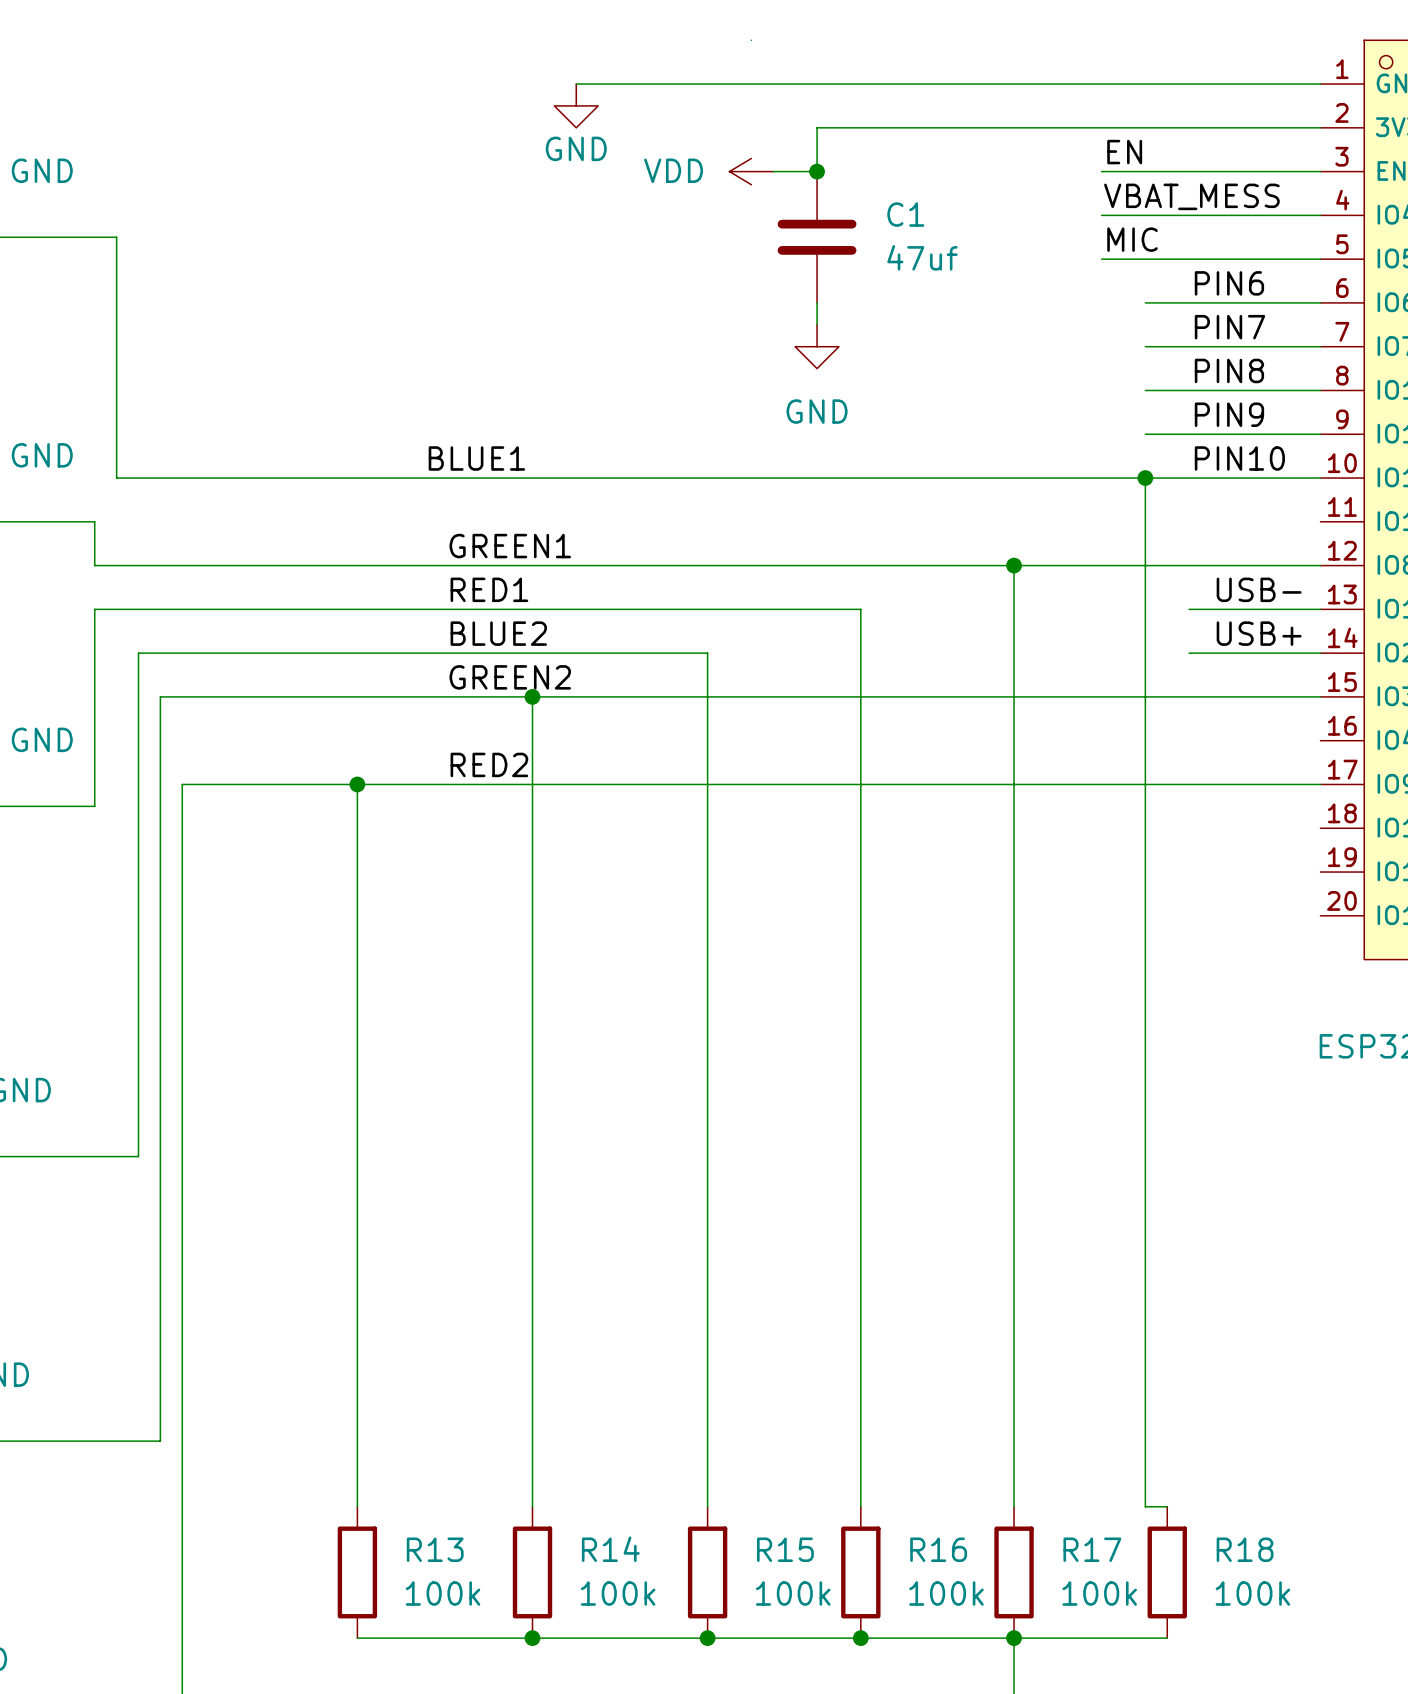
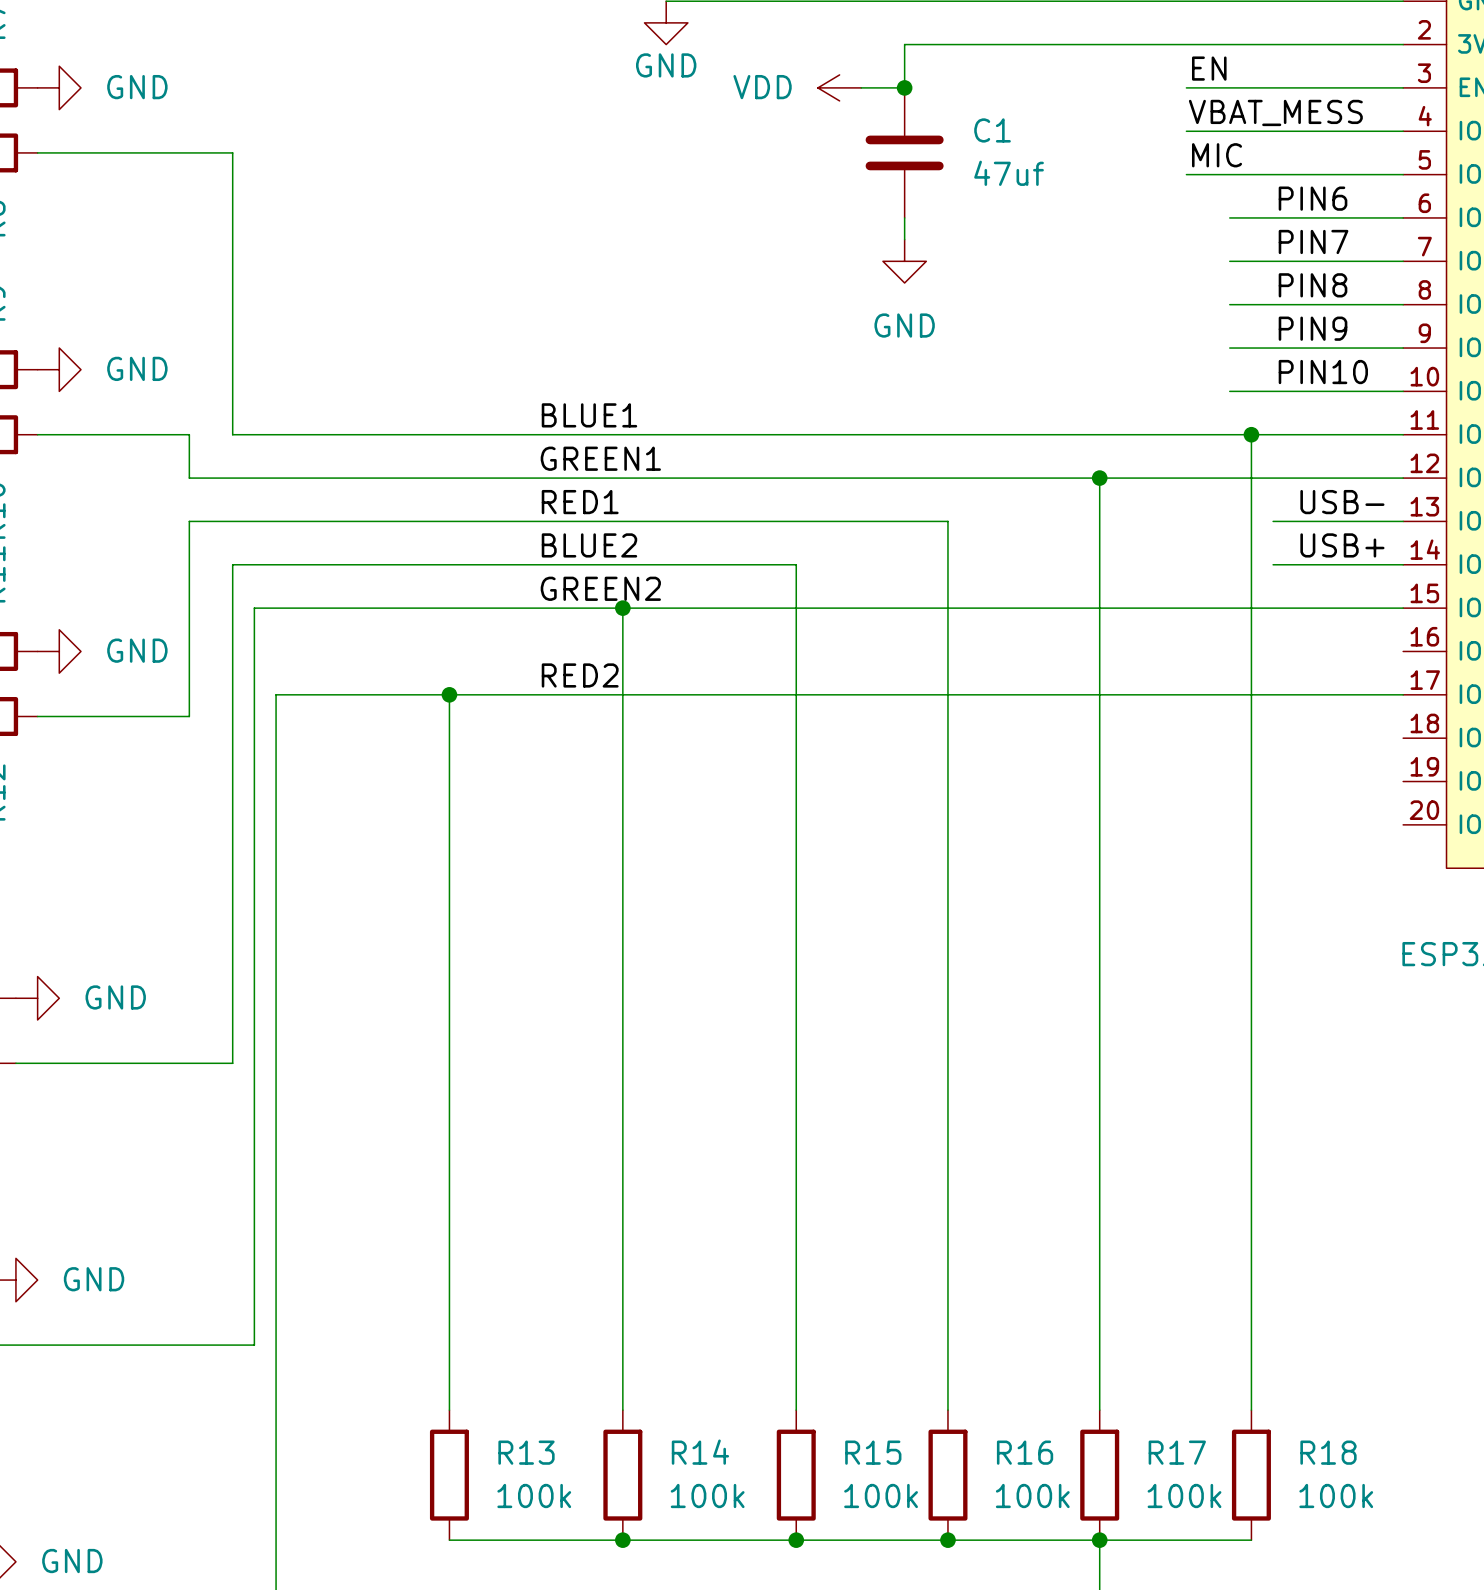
wire: (116, 237) (116, 478) (1145, 478) (1145, 1506) (1167, 1506) -> (211, 152) (232, 152) (232, 434) (1403, 434)
label position: BLUE1 (476, 458) -> BLUE1 (589, 415)
junction position: (1145, 478) -> (1251, 434)
wire: none -> (1251, 434) (1251, 1410)

